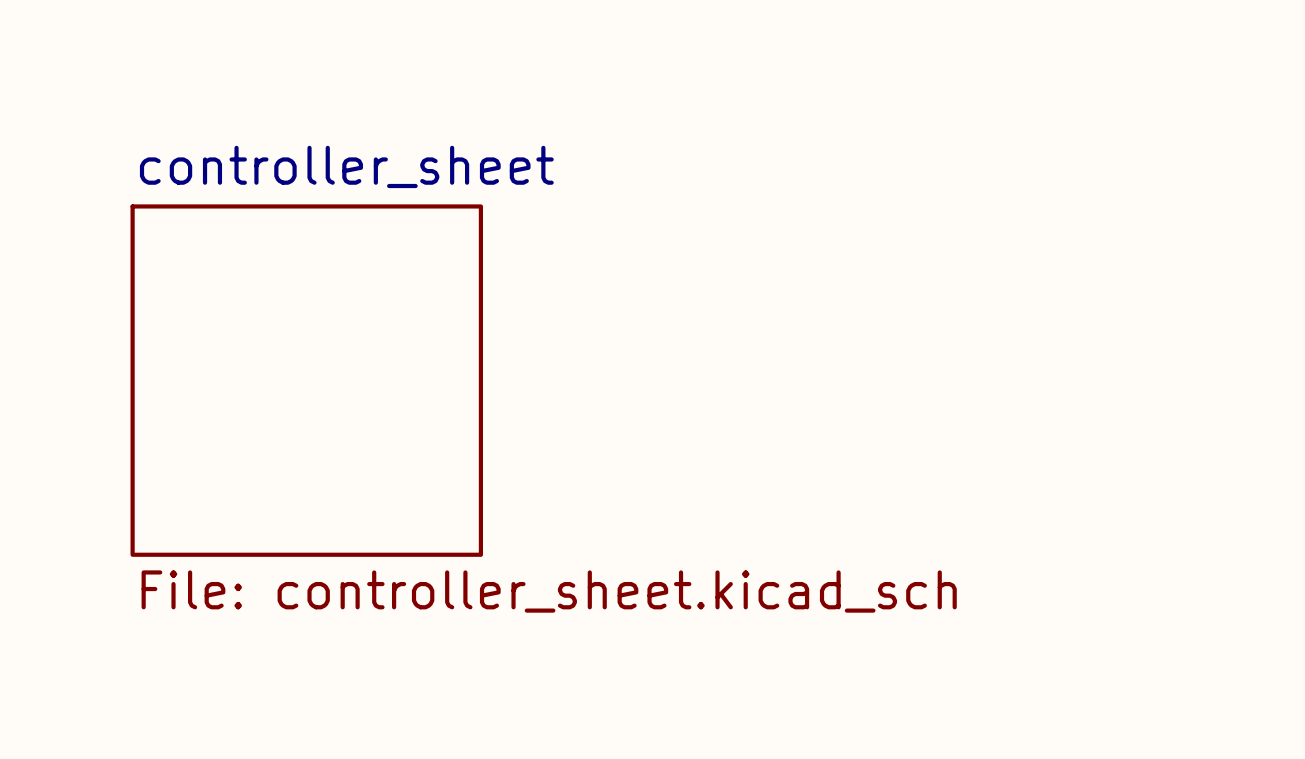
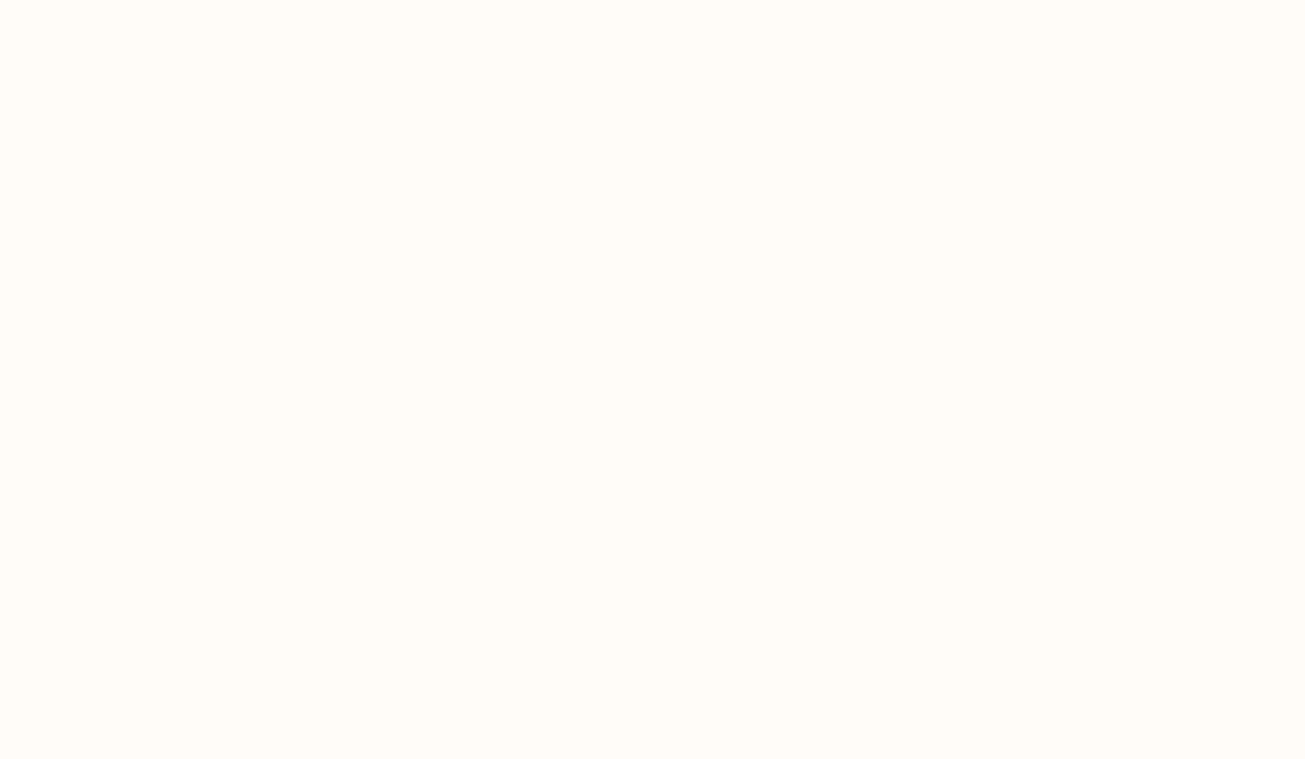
sheet controller_sheet: File: controller_sheet.kicad_sch (306, 380) -> none

